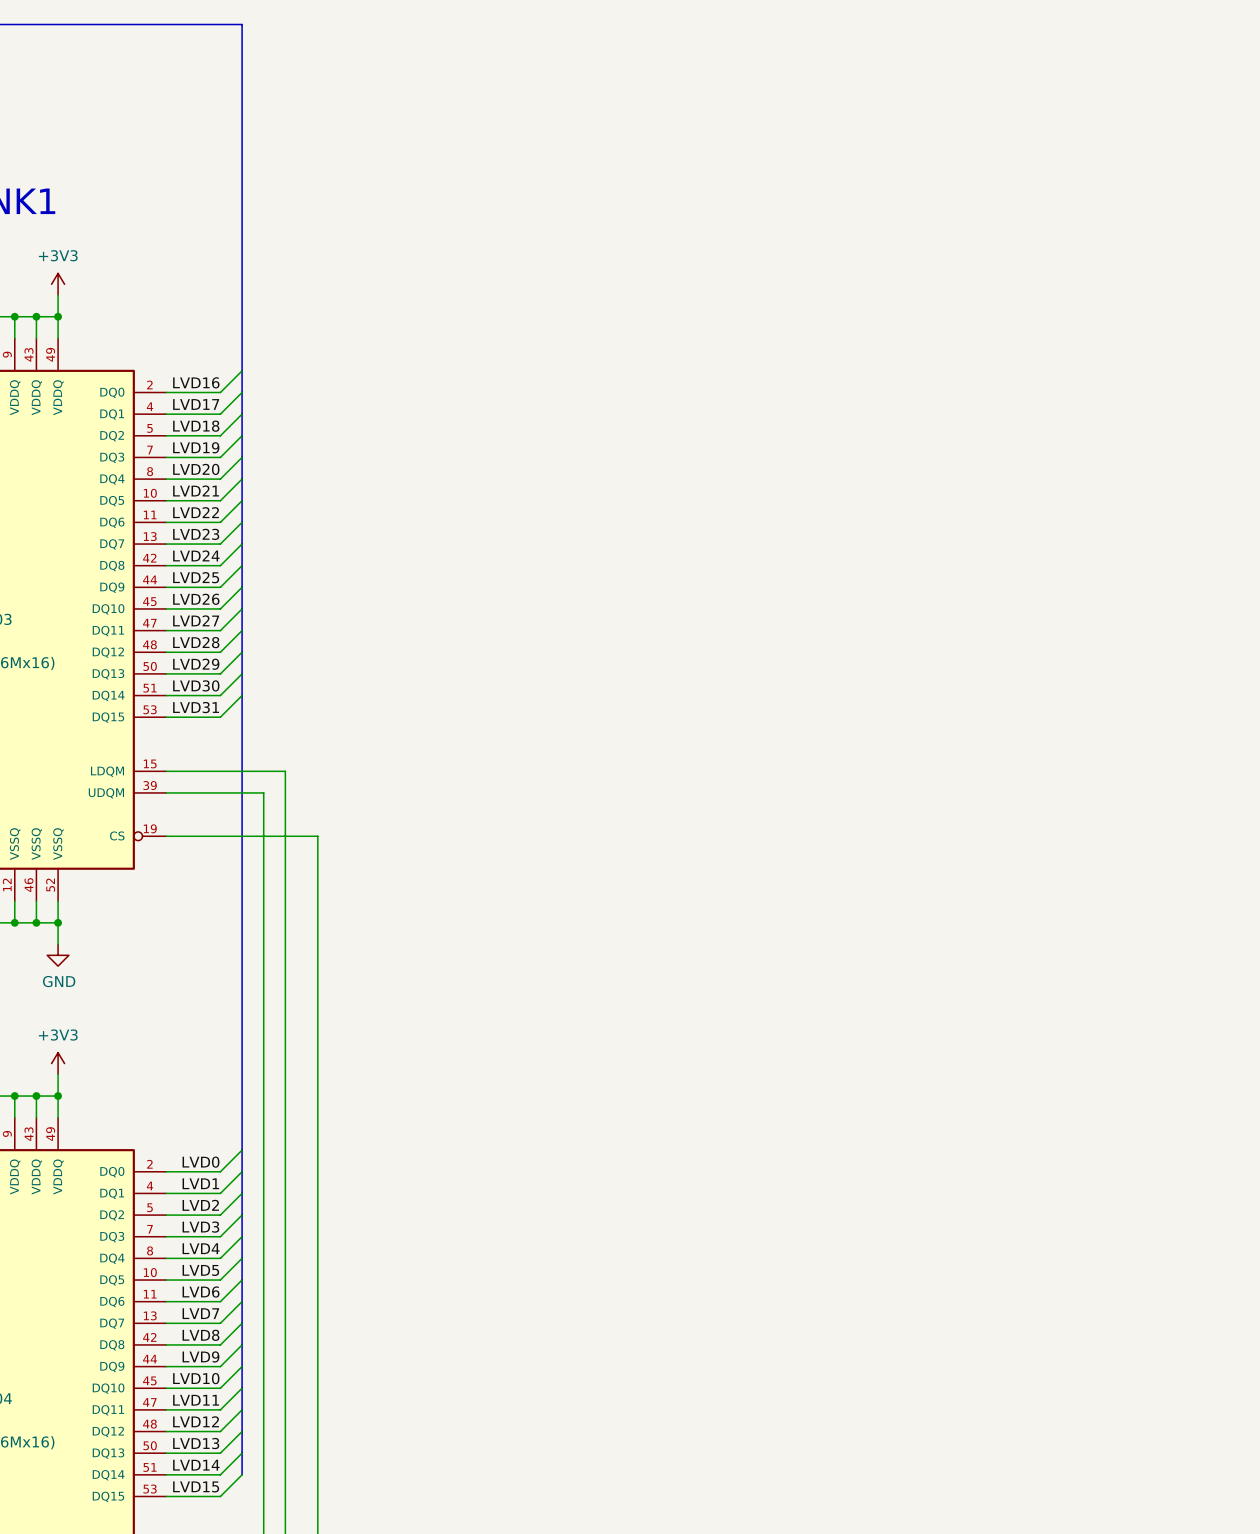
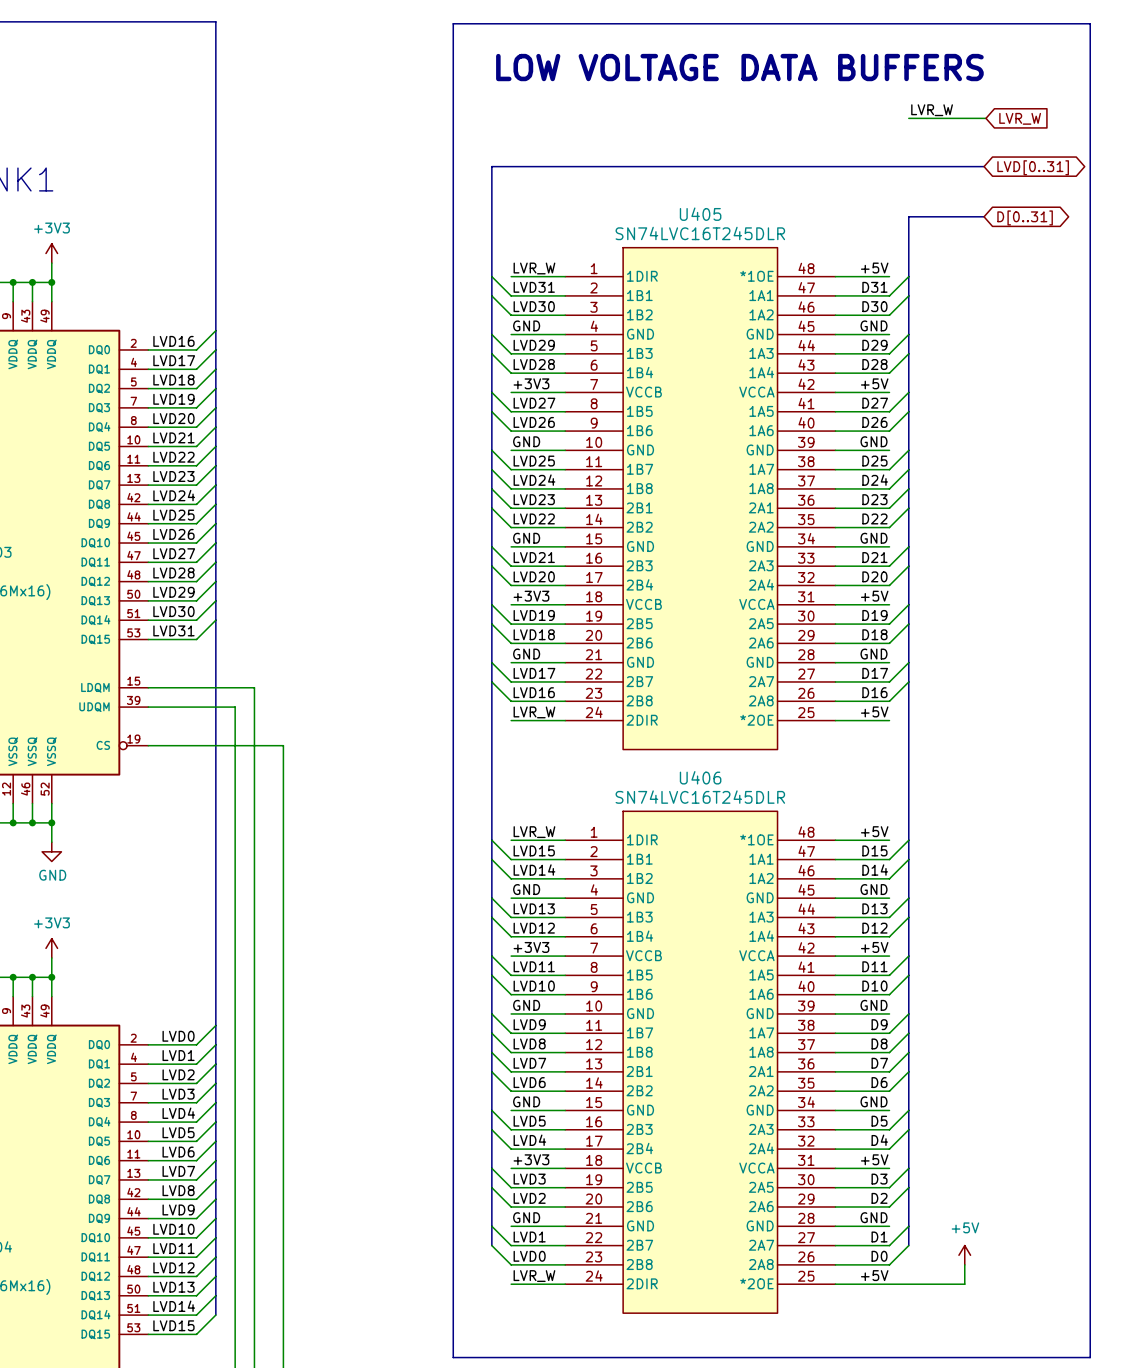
line: none -> (453, 23) (1090, 23) (1090, 1357) (453, 1357) (453, 23)
text: none -> LOW VOLTAGE DATA BUFFERS (739, 67)
label: none -> LVR_W (932, 110)
wire: none -> (908, 118) (985, 118)
global label: none -> LVR_W (1020, 118)
bus: none -> (984, 166) (491, 166) (491, 1245)
global label: none -> LVD[0..31] (1033, 167)
bus: none -> (984, 216) (908, 216) (908, 1245)
global label: none -> D[0..31] (1025, 217)
label: none -> +5V (874, 268)
label: none -> LVR_W (534, 268)
wire: none -> (491, 276) (511, 295) (565, 295)
wire: none -> (511, 276) (565, 276)
wire: none -> (835, 276) (889, 276)
wire: none -> (908, 276) (889, 295) (835, 295)
label: none -> LVD31 (534, 287)
label: none -> D31 (874, 287)
wire: none -> (491, 295) (511, 315) (565, 315)
wire: none -> (908, 295) (889, 315) (835, 315)
label: none -> LVD30 (534, 306)
label: none -> D30 (874, 306)
label: none -> GND (526, 325)
label: none -> GND (874, 325)
wire: none -> (491, 334) (511, 353) (565, 353)
wire: none -> (511, 334) (565, 334)
wire: none -> (835, 334) (889, 334)
wire: none -> (908, 334) (889, 353) (835, 353)
label: none -> LVD29 (534, 345)
label: none -> D29 (874, 345)
wire: none -> (491, 353) (511, 373) (565, 373)
wire: none -> (908, 353) (889, 373) (835, 373)
label: none -> LVD28 (534, 364)
label: none -> D28 (874, 364)
label: none -> +3V3 (531, 383)
label: none -> +5V (874, 383)
wire: none -> (491, 392) (511, 411) (565, 411)
wire: none -> (511, 392) (565, 392)
wire: none -> (835, 392) (889, 392)
wire: none -> (908, 392) (889, 411) (835, 411)
label: none -> LVD27 (534, 403)
label: none -> D27 (875, 403)
wire: none -> (491, 411) (511, 431) (565, 431)
wire: none -> (908, 411) (889, 431) (835, 431)
label: none -> LVD26 (534, 422)
label: none -> D26 (874, 422)
label: none -> GND (526, 441)
label: none -> GND (874, 441)
wire: none -> (491, 450) (511, 469) (565, 469)
wire: none -> (511, 450) (565, 450)
wire: none -> (835, 450) (889, 450)
wire: none -> (908, 450) (889, 469) (835, 469)
label: none -> LVD25 (534, 461)
label: none -> D25 (874, 461)
wire: none -> (491, 469) (511, 488) (565, 488)
wire: none -> (908, 469) (889, 488) (835, 488)
label: none -> LVD24 (534, 480)
label: none -> D24 (875, 480)
wire: none -> (491, 488) (511, 508) (565, 508)
wire: none -> (908, 488) (889, 508) (835, 508)
U405: none -> SN74LVC16T245DLR (700, 498)
label: none -> LVD23 (534, 499)
label: none -> D23 (874, 499)
wire: none -> (491, 508) (511, 527) (565, 527)
wire: none -> (908, 508) (889, 527) (835, 527)
label: none -> LVD22 (534, 518)
label: none -> D22 (874, 518)
label: none -> GND (526, 538)
label: none -> GND (874, 538)
wire: none -> (491, 546) (511, 566) (565, 566)
wire: none -> (511, 546) (565, 546)
wire: none -> (835, 546) (889, 546)
wire: none -> (908, 546) (889, 566) (835, 566)
label: none -> LVD21 (534, 557)
label: none -> D21 (874, 557)
wire: none -> (491, 566) (511, 585) (565, 585)
wire: none -> (908, 566) (889, 585) (835, 585)
label: none -> LVD20 (534, 576)
label: none -> D20 (874, 576)
label: none -> +3V3 (531, 596)
label: none -> +5V (874, 596)
wire: none -> (491, 604) (511, 624) (565, 624)
wire: none -> (511, 604) (565, 604)
wire: none -> (835, 604) (889, 604)
wire: none -> (908, 604) (889, 624) (835, 624)
label: none -> LVD19 (534, 615)
label: none -> D19 (874, 615)
wire: none -> (491, 624) (511, 643) (565, 643)
wire: none -> (908, 624) (889, 643) (835, 643)
label: none -> LVD18 (534, 634)
label: none -> D18 (874, 634)
label: none -> GND (526, 654)
label: none -> GND (874, 654)
wire: none -> (491, 662) (511, 681) (565, 681)
wire: none -> (511, 662) (565, 662)
wire: none -> (835, 662) (889, 662)
wire: none -> (908, 662) (889, 681) (835, 681)
label: none -> LVD17 (534, 673)
label: none -> D17 (875, 673)
wire: none -> (491, 681) (511, 701) (565, 701)
wire: none -> (908, 681) (889, 701) (835, 701)
label: none -> LVD16 (534, 692)
label: none -> D16 (874, 692)
label: none -> +5V (874, 711)
label: none -> LVR_W (534, 712)
wire: none -> (511, 720) (565, 720)
wire: none -> (835, 720) (889, 720)
label: none -> +5V (874, 831)
label: none -> LVR_W (534, 832)
wire: none -> (491, 840) (511, 859) (565, 859)
wire: none -> (511, 840) (565, 840)
wire: none -> (835, 840) (889, 840)
wire: none -> (908, 840) (889, 859) (835, 859)
label: none -> LVD15 (534, 850)
label: none -> D15 (874, 850)
wire: none -> (491, 859) (511, 878) (565, 878)
wire: none -> (908, 859) (889, 878) (835, 878)
label: none -> LVD14 (534, 870)
label: none -> D14 (875, 870)
label: none -> GND (526, 889)
label: none -> GND (874, 889)
wire: none -> (491, 898) (511, 917) (565, 917)
wire: none -> (511, 898) (565, 898)
wire: none -> (835, 898) (889, 898)
wire: none -> (908, 898) (889, 917) (835, 917)
label: none -> LVD13 (534, 908)
label: none -> D13 (874, 908)
wire: none -> (491, 917) (511, 936) (565, 936)
wire: none -> (908, 917) (889, 936) (835, 936)
label: none -> LVD12 (534, 928)
label: none -> D12 (874, 928)
label: none -> +3V3 (531, 947)
label: none -> +5V (874, 947)
wire: none -> (491, 956) (511, 975) (565, 975)
wire: none -> (511, 956) (565, 956)
wire: none -> (835, 956) (889, 956)
wire: none -> (908, 956) (889, 975) (835, 975)
label: none -> LVD11 (534, 966)
label: none -> D11 (874, 966)
wire: none -> (491, 975) (511, 994) (565, 994)
wire: none -> (908, 975) (889, 994) (835, 994)
label: none -> LVD10 (534, 986)
label: none -> D10 (874, 986)
label: none -> GND (526, 1005)
label: none -> GND (874, 1005)
wire: none -> (491, 1013) (511, 1033) (565, 1033)
wire: none -> (511, 1013) (565, 1013)
wire: none -> (835, 1013) (889, 1013)
wire: none -> (908, 1013) (889, 1033) (835, 1033)
label: none -> LVD9 (529, 1024)
label: none -> D9 (879, 1024)
wire: none -> (491, 1033) (511, 1052) (565, 1052)
wire: none -> (908, 1033) (889, 1052) (835, 1052)
label: none -> LVD8 (529, 1043)
label: none -> D8 (879, 1043)
wire: none -> (491, 1052) (511, 1071) (565, 1071)
wire: none -> (908, 1052) (889, 1071) (835, 1071)
U406: none -> SN74LVC16T245DLR (700, 1062)
label: none -> LVD7 (529, 1063)
label: none -> D7 (879, 1063)
wire: none -> (491, 1071) (511, 1091) (565, 1091)
wire: none -> (908, 1071) (889, 1091) (835, 1091)
label: none -> LVD6 (529, 1082)
label: none -> D6 (879, 1082)
label: none -> GND (526, 1101)
label: none -> GND (874, 1101)
wire: none -> (491, 1110) (511, 1129) (565, 1129)
wire: none -> (511, 1110) (565, 1110)
wire: none -> (835, 1110) (889, 1110)
wire: none -> (908, 1110) (889, 1129) (835, 1129)
label: none -> LVD5 (529, 1121)
label: none -> D5 (879, 1121)
wire: none -> (491, 1129) (511, 1149) (565, 1149)
wire: none -> (908, 1129) (889, 1149) (835, 1149)
label: none -> LVD4 (529, 1140)
label: none -> D4 (879, 1140)
label: none -> +3V3 (531, 1159)
label: none -> +5V (874, 1159)
wire: none -> (491, 1168) (511, 1187) (565, 1187)
wire: none -> (511, 1168) (565, 1168)
wire: none -> (835, 1168) (889, 1168)
wire: none -> (908, 1168) (889, 1187) (835, 1187)
label: none -> LVD3 (529, 1179)
label: none -> D3 (879, 1179)
wire: none -> (491, 1187) (511, 1206) (565, 1206)
wire: none -> (908, 1187) (889, 1206) (835, 1206)
label: none -> LVD2 (529, 1198)
label: none -> D2 (879, 1198)
label: none -> GND (526, 1217)
label: none -> GND (874, 1217)
wire: none -> (491, 1226) (511, 1245) (565, 1245)
wire: none -> (511, 1226) (565, 1226)
wire: none -> (835, 1226) (889, 1226)
wire: none -> (908, 1226) (889, 1245) (835, 1245)
label: none -> LVD1 (529, 1236)
label: none -> D1 (879, 1236)
wire: none -> (491, 1245) (511, 1264) (565, 1264)
wire: none -> (908, 1245) (889, 1264) (835, 1264)
power symbol: none -> +5V (964, 1255)
label: none -> LVD0 (529, 1256)
label: none -> D0 (879, 1256)
wire: none -> (964, 1264) (964, 1284) (835, 1284)
label: none -> +5V (874, 1275)
label: none -> LVR_W (534, 1276)
wire: none -> (511, 1284) (565, 1284)

